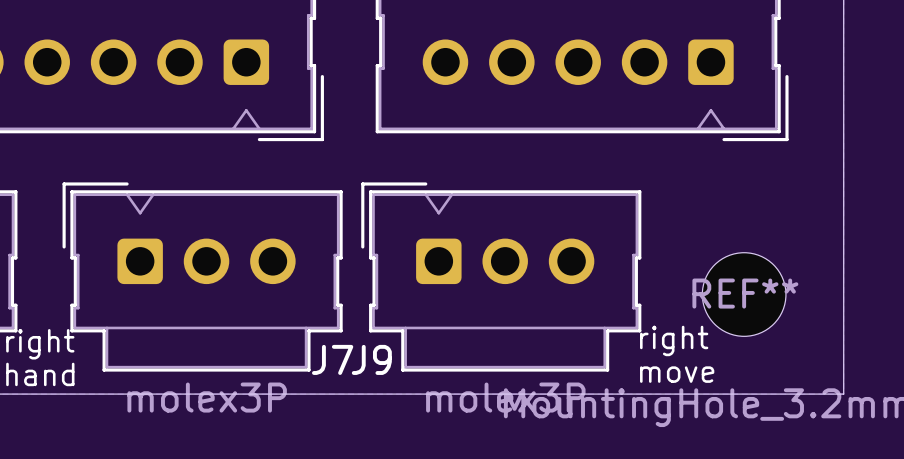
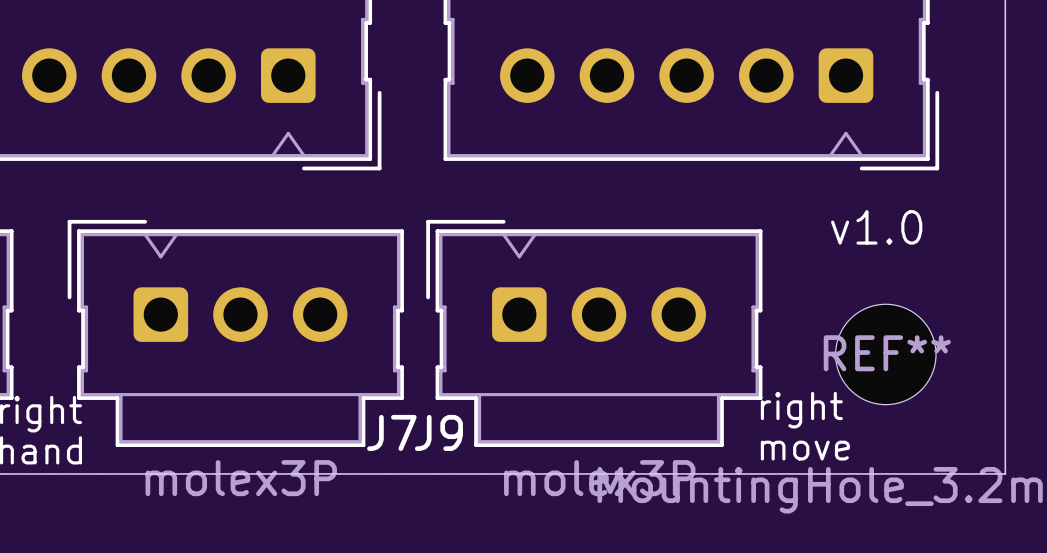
text: none -> v1.0 (876, 227)

